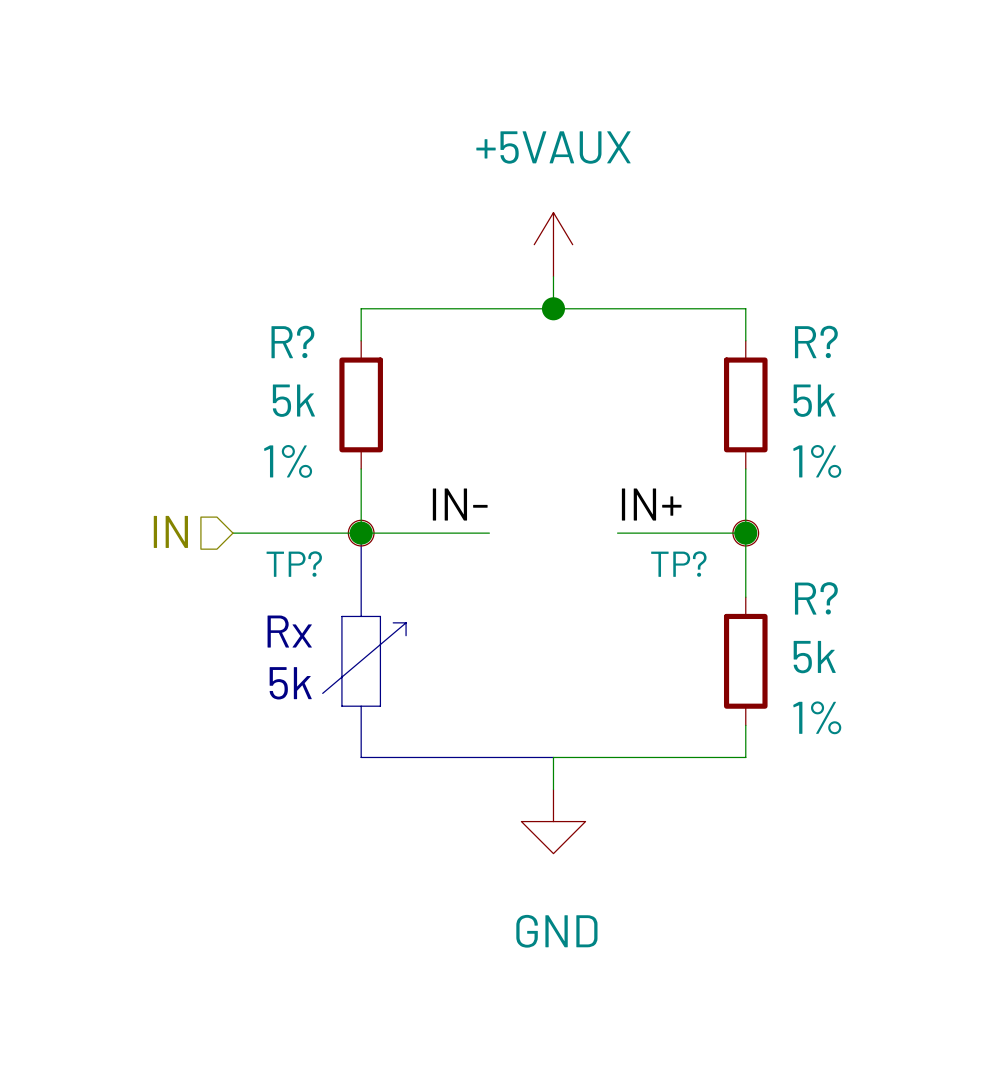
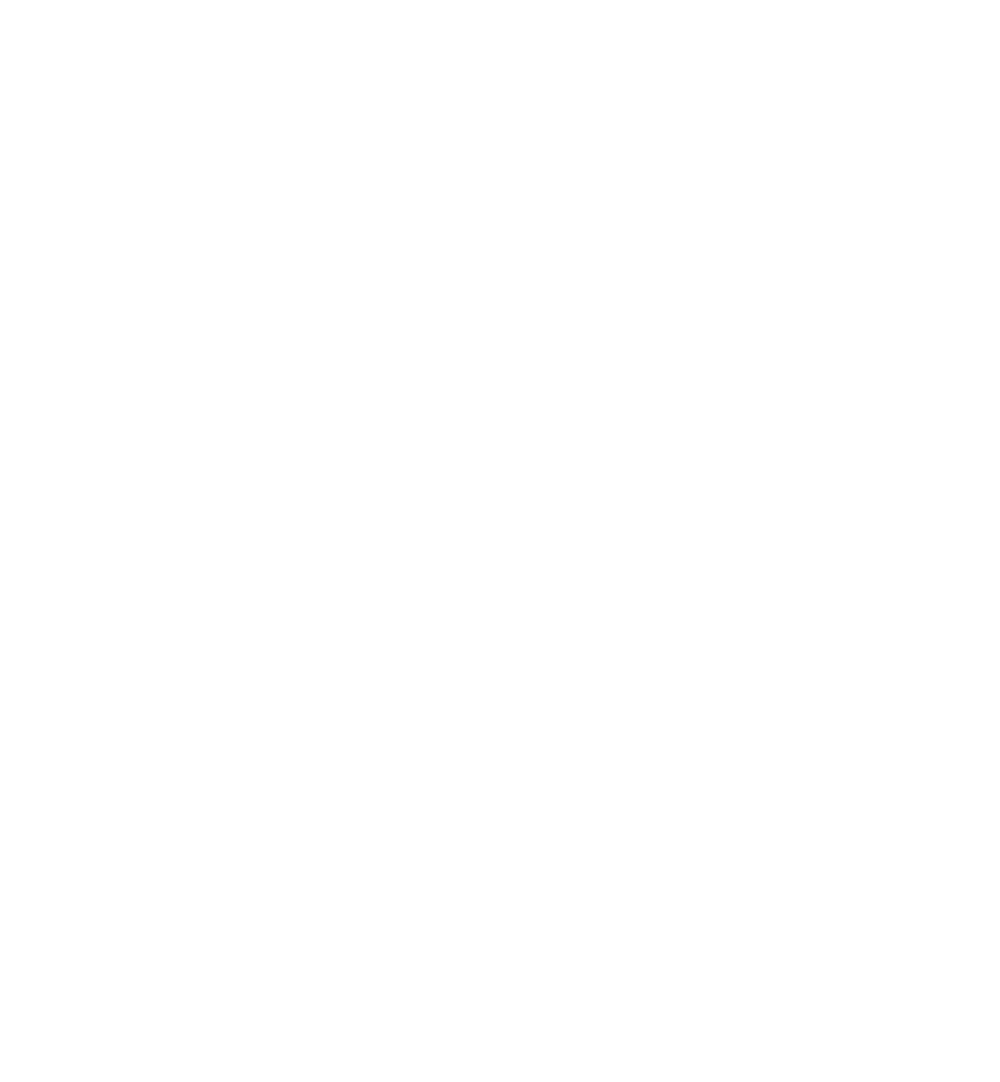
power symbol: +5VAUX (553, 244) -> none
wire: (553, 276) (553, 308) -> none
junction: (553, 308) -> none
wire: (361, 340) (361, 308) (745, 308) (745, 340) -> none
R?: 5k (361, 404) -> none
R?: 5k (745, 404) -> none
wire: (361, 469) (361, 533) -> none
wire: (745, 469) (745, 597) -> none
label: IN- (460, 504) -> none
label: IN+ (651, 504) -> none
hierarchical label: IN (170, 531) -> none
wire: (232, 533) (489, 533) -> none
junction: (361, 533) -> none
TP?: (361, 533) -> none
wire: (617, 533) (745, 533) -> none
junction: (745, 533) -> none
TP?: (745, 533) -> none
line: (361, 542) (361, 616) -> none
line: (341, 616) (341, 706) (380, 706) (380, 616) (341, 616) -> none
line: (393, 622) (406, 622) -> none
line: (406, 622) (406, 635) -> none
line: (406, 622) (322, 693) -> none
text: Rx (289, 631) -> none
R?: 5k (745, 661) -> none
text: 5k (290, 683) -> none
line: (361, 706) (361, 757) (553, 757) -> none
wire: (745, 725) (745, 757) (553, 757) (553, 789) -> none
power symbol: GND (553, 821) -> none

